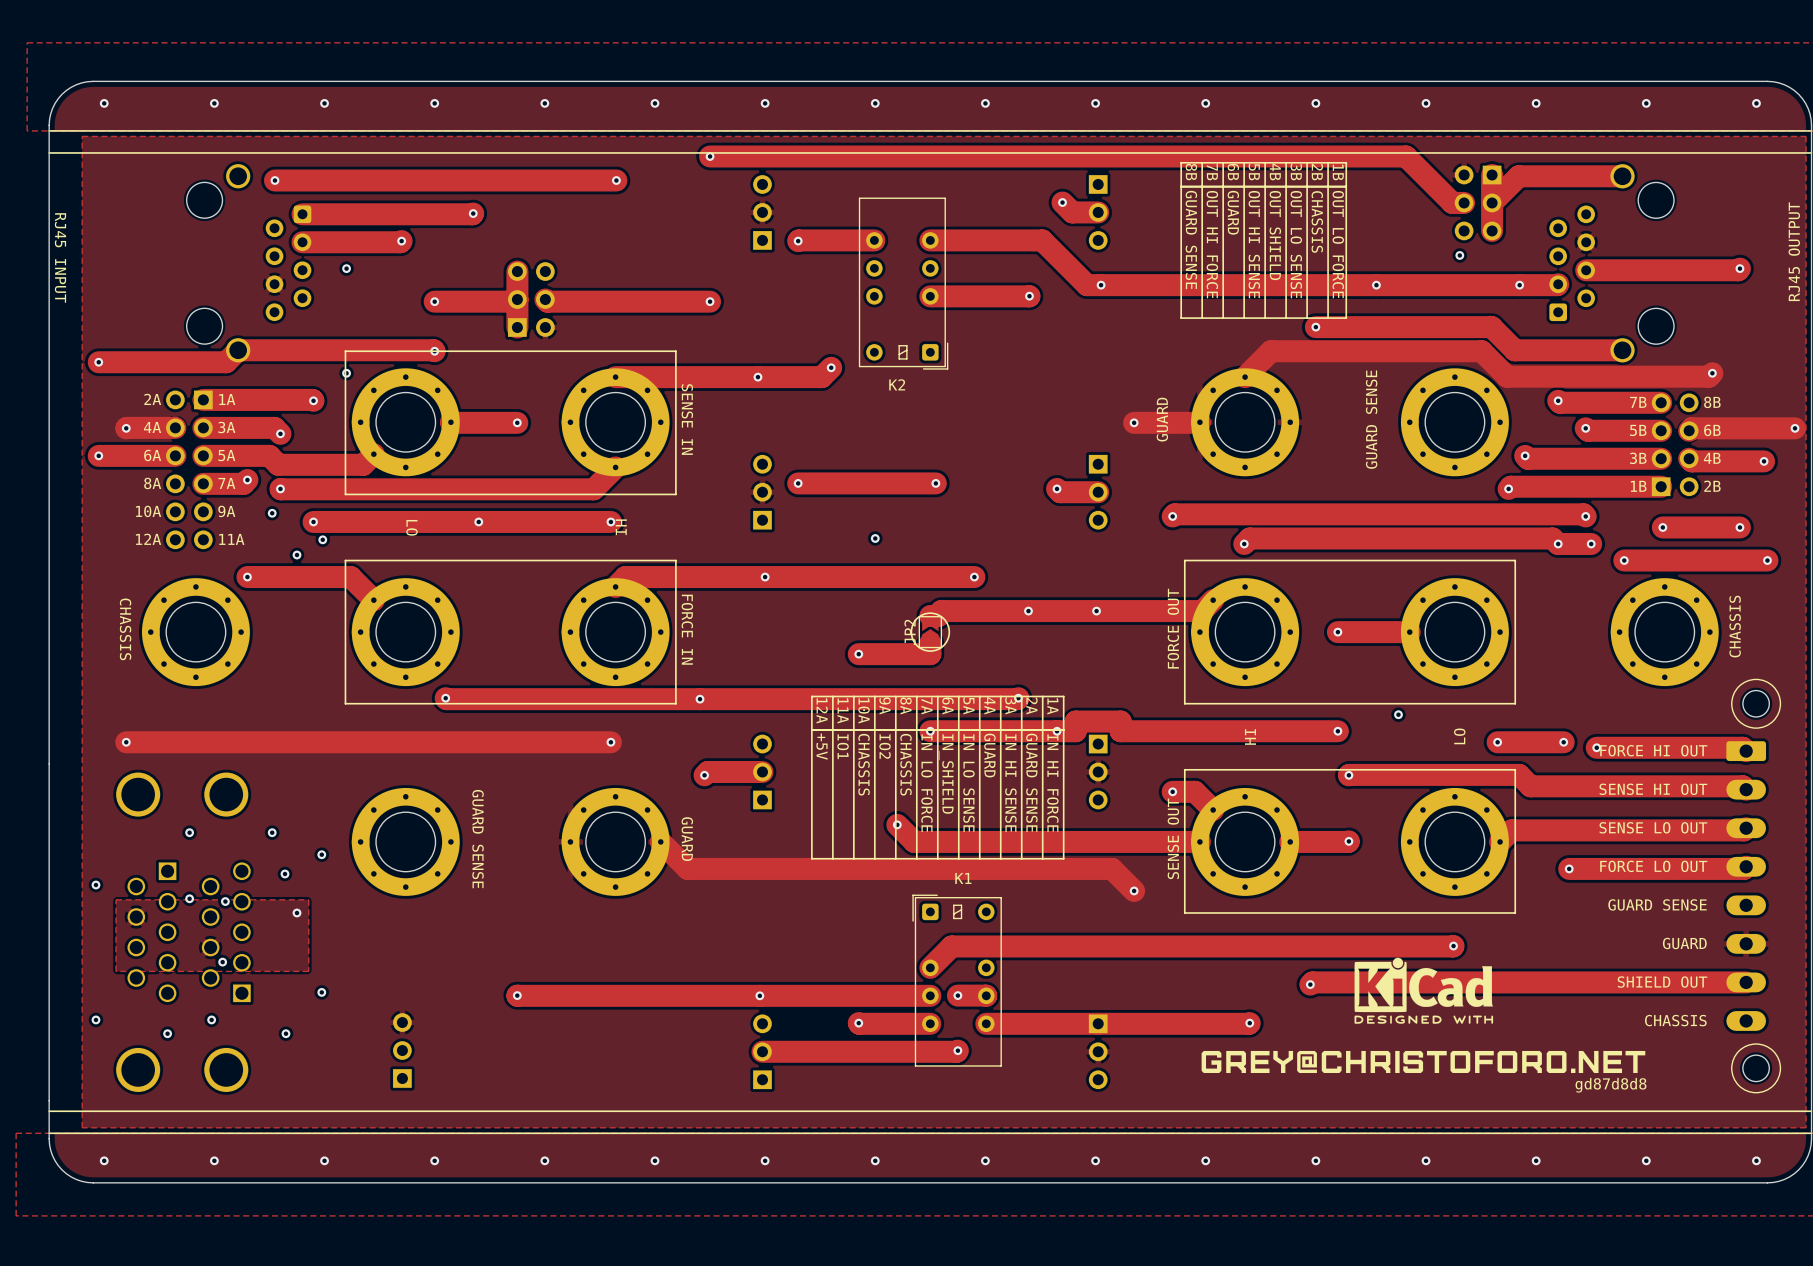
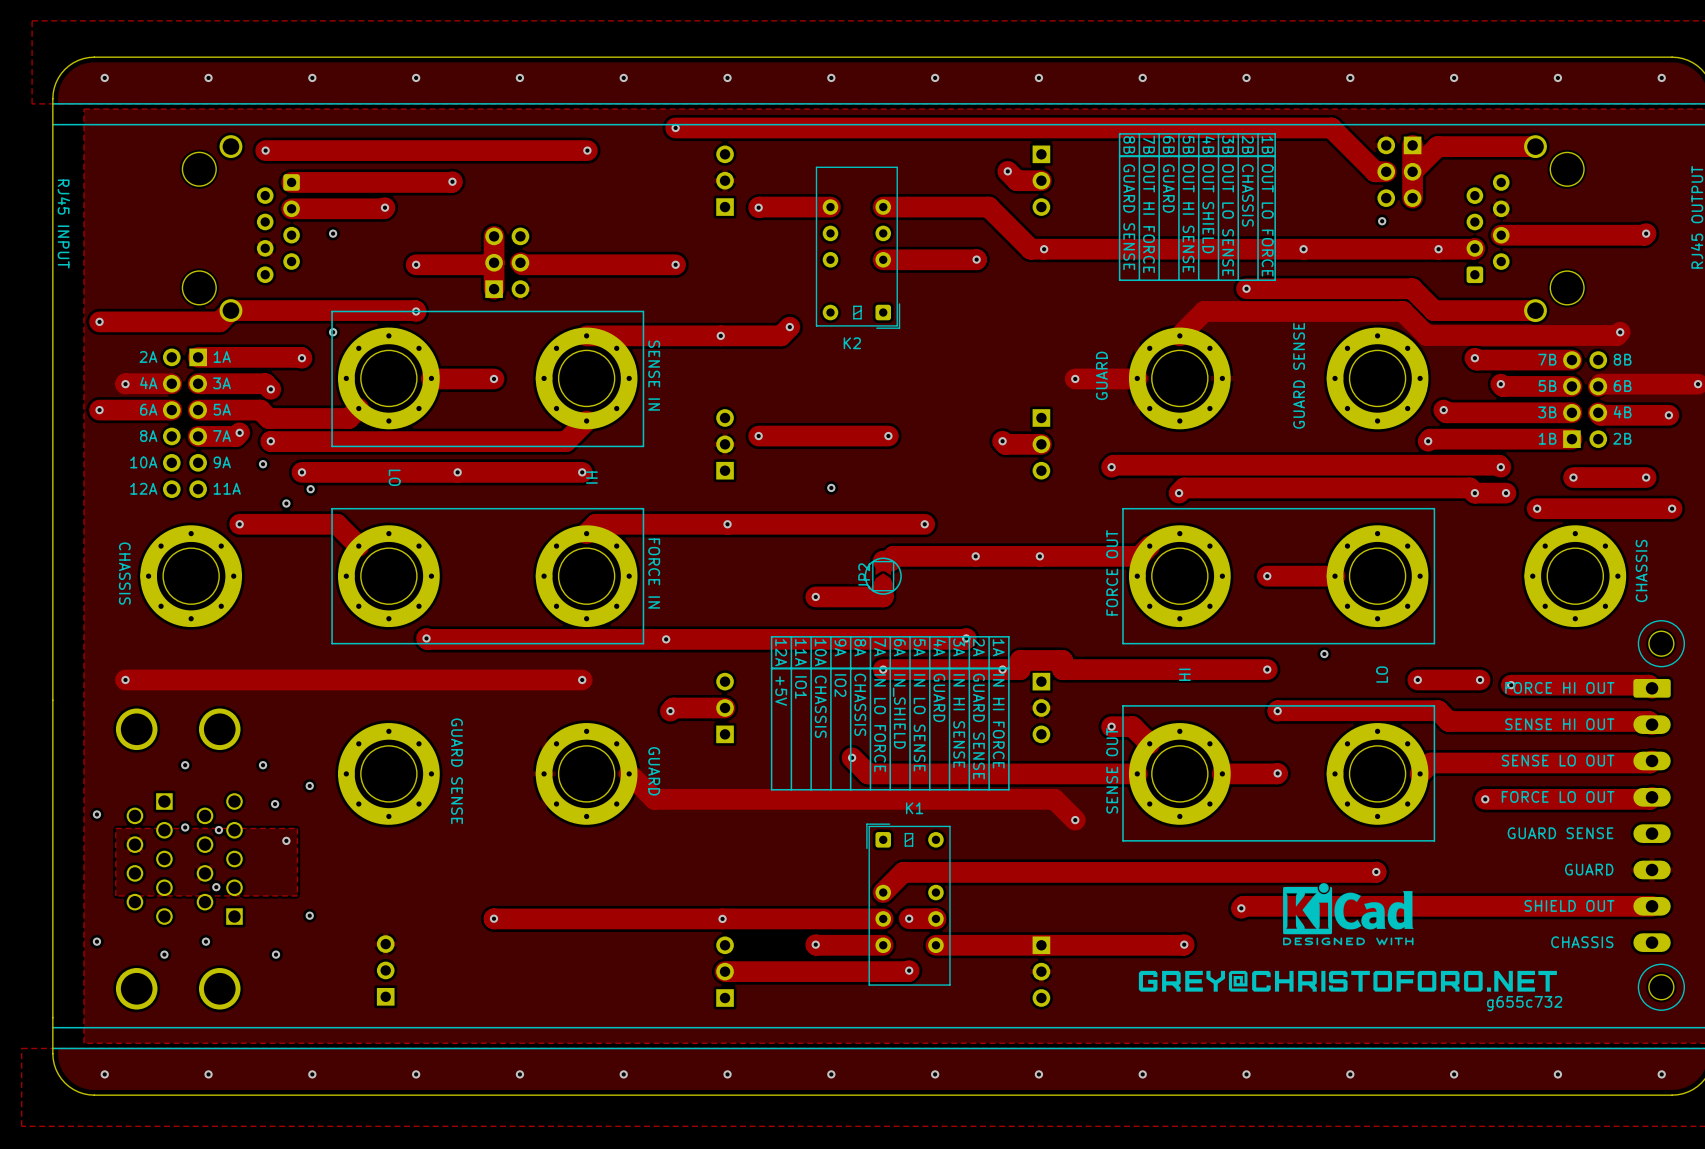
text: gd87d8d8 (1610, 1085) -> g655c732 (1524, 1003)

